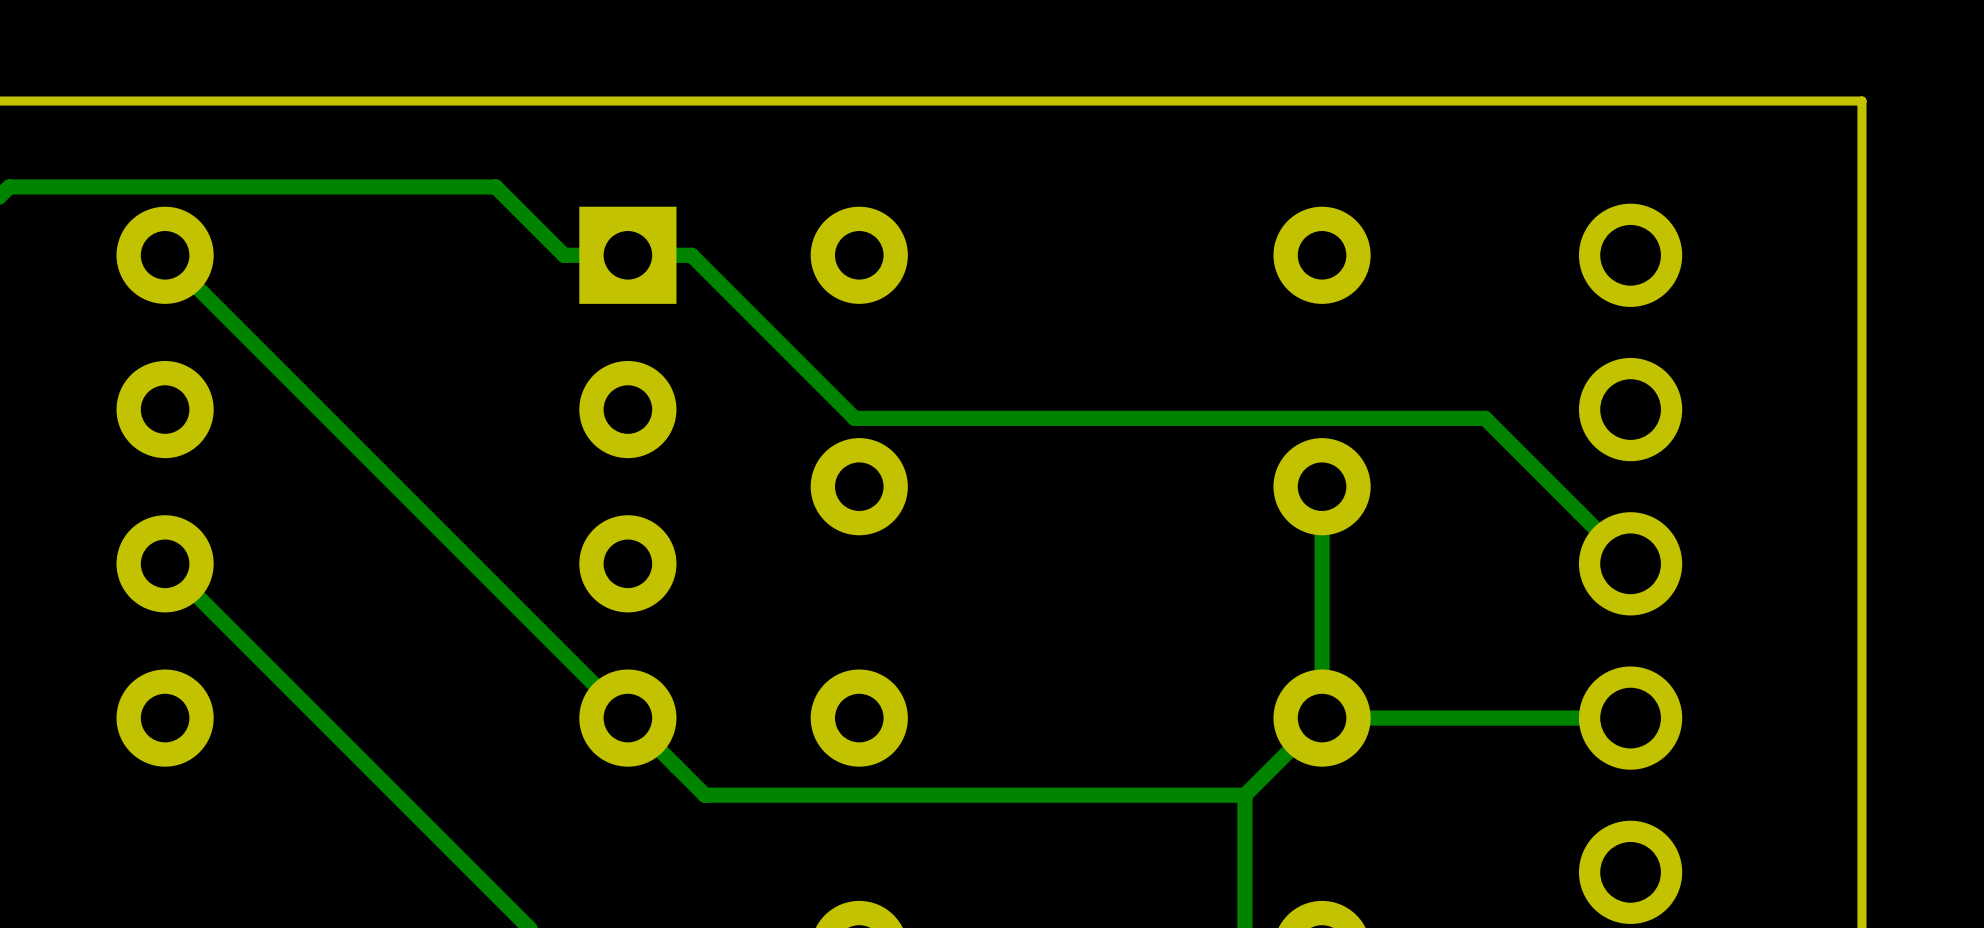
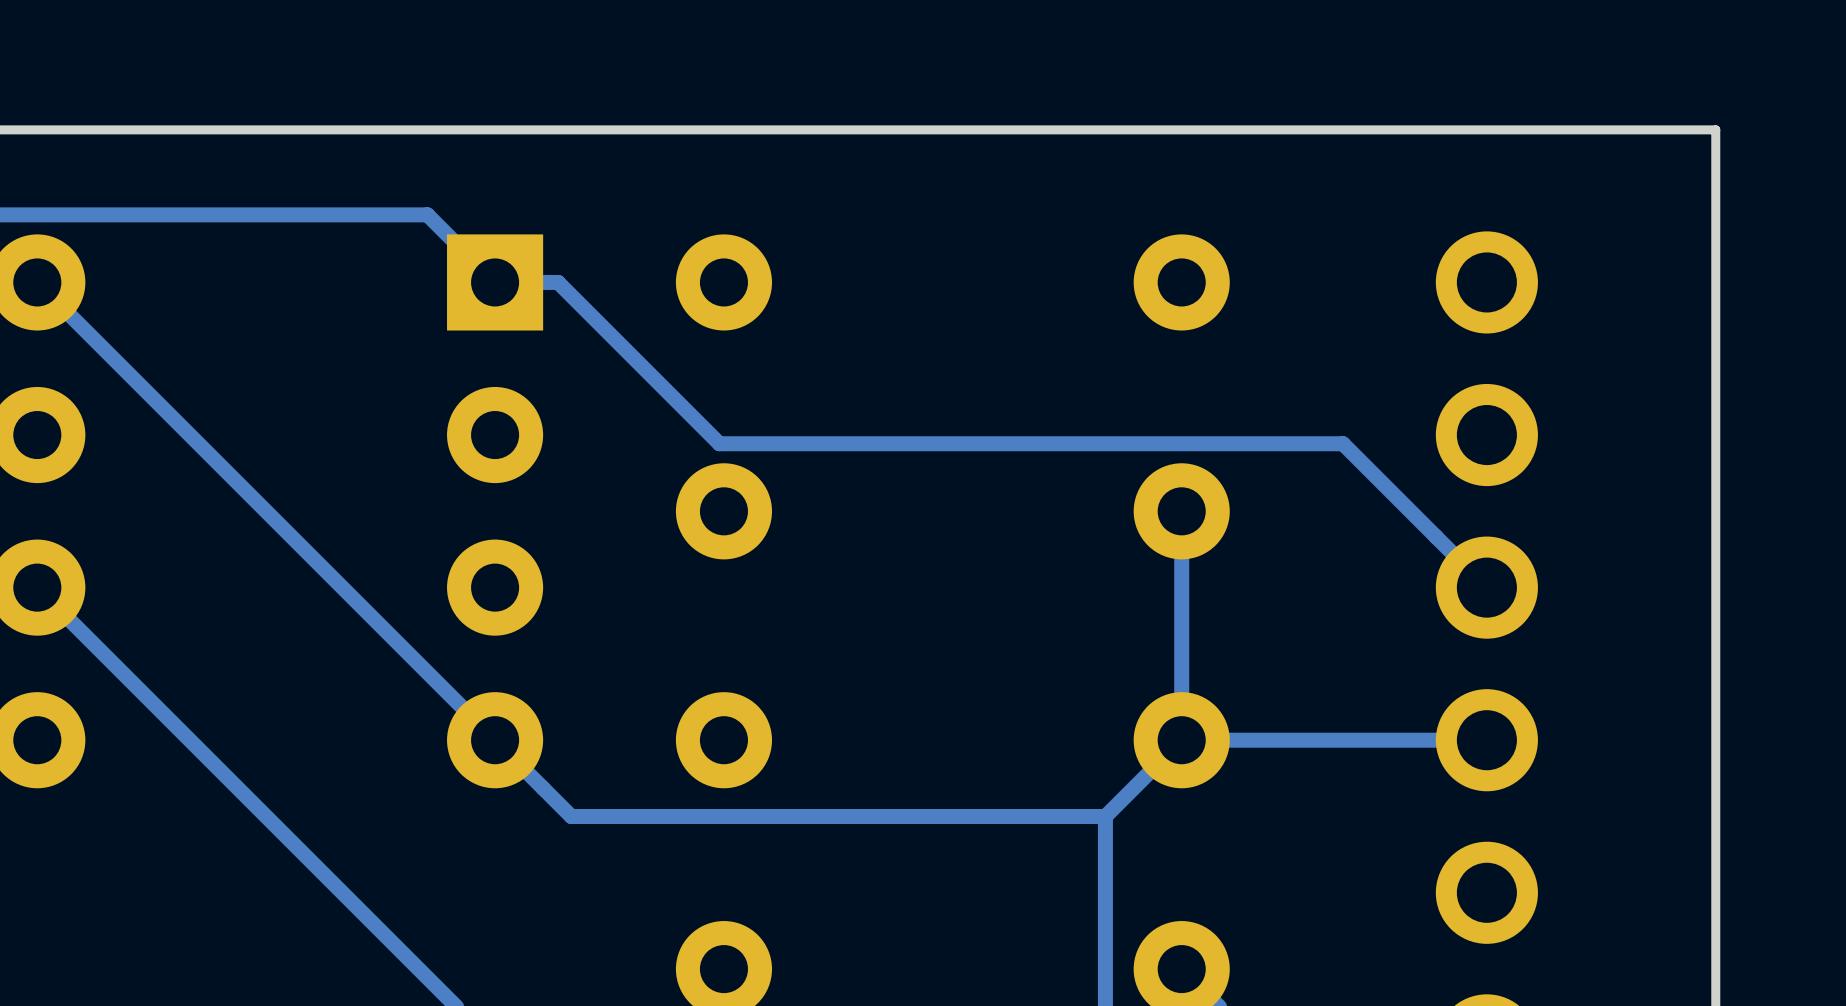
track: (495, 186) (564, 255) (627, 255) -> (364, 214) (427, 214) (475, 263)

